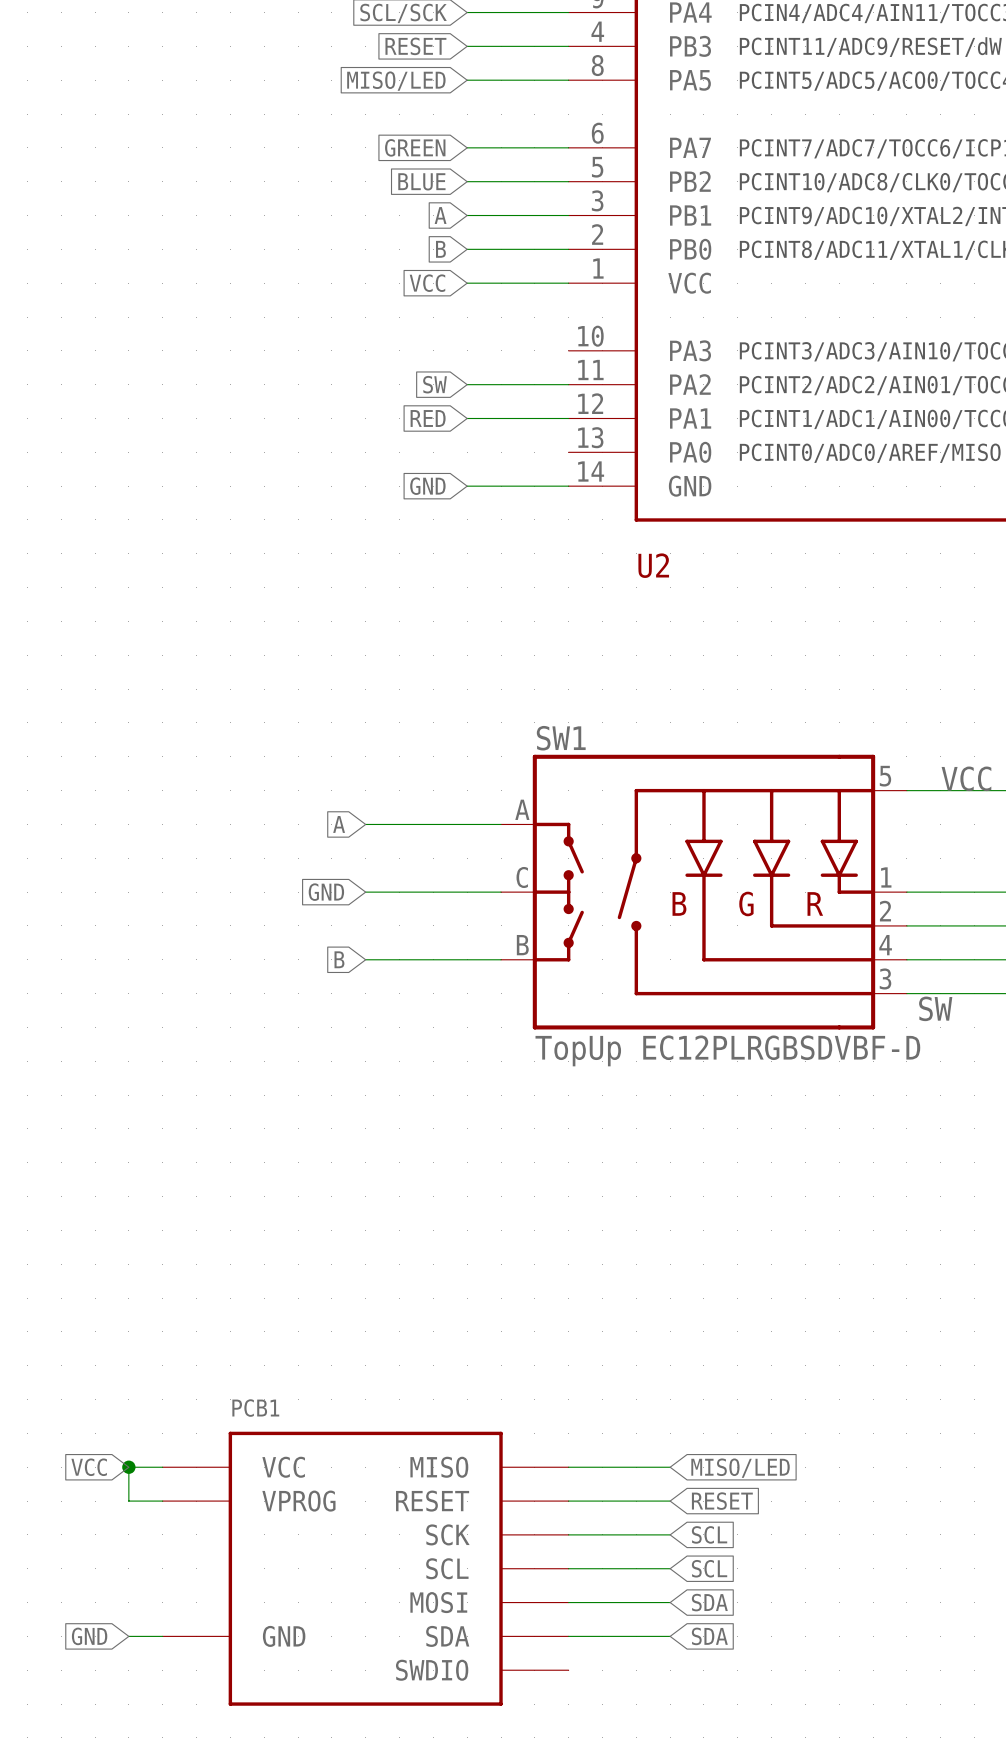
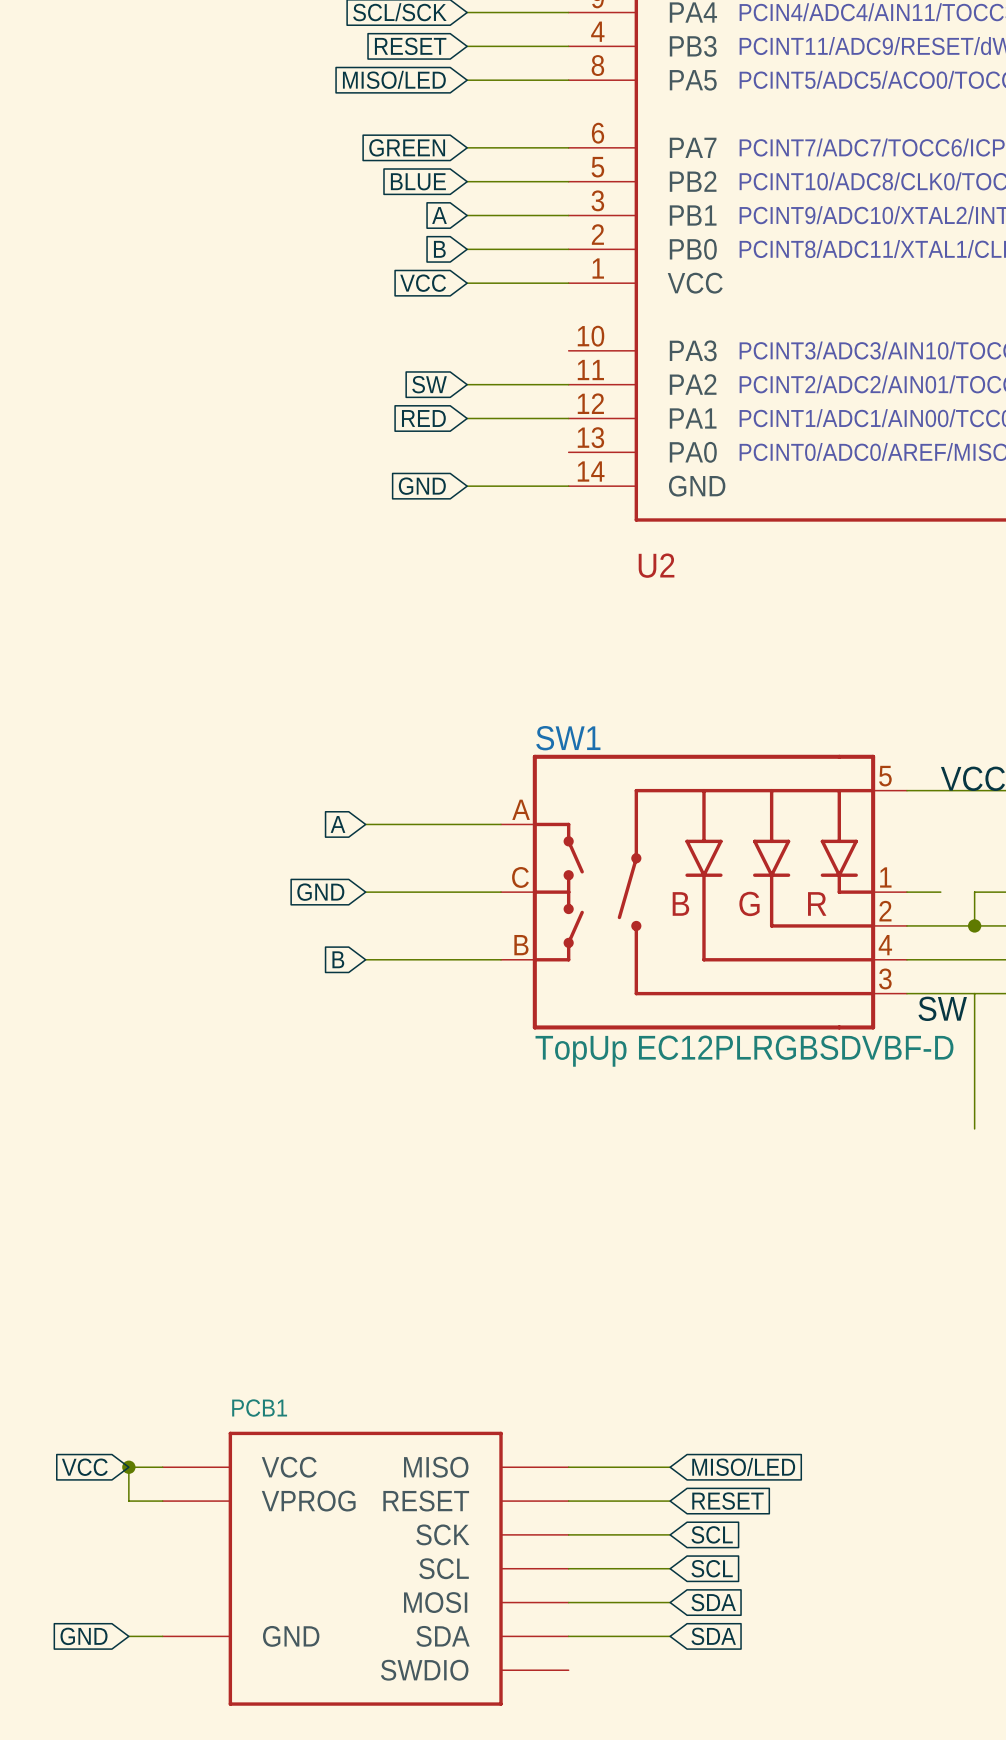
wire: (940, 892) (974, 892) -> (974, 925) (974, 892)
junction: none -> (974, 925)
wire: none -> (974, 993) (974, 1128)

